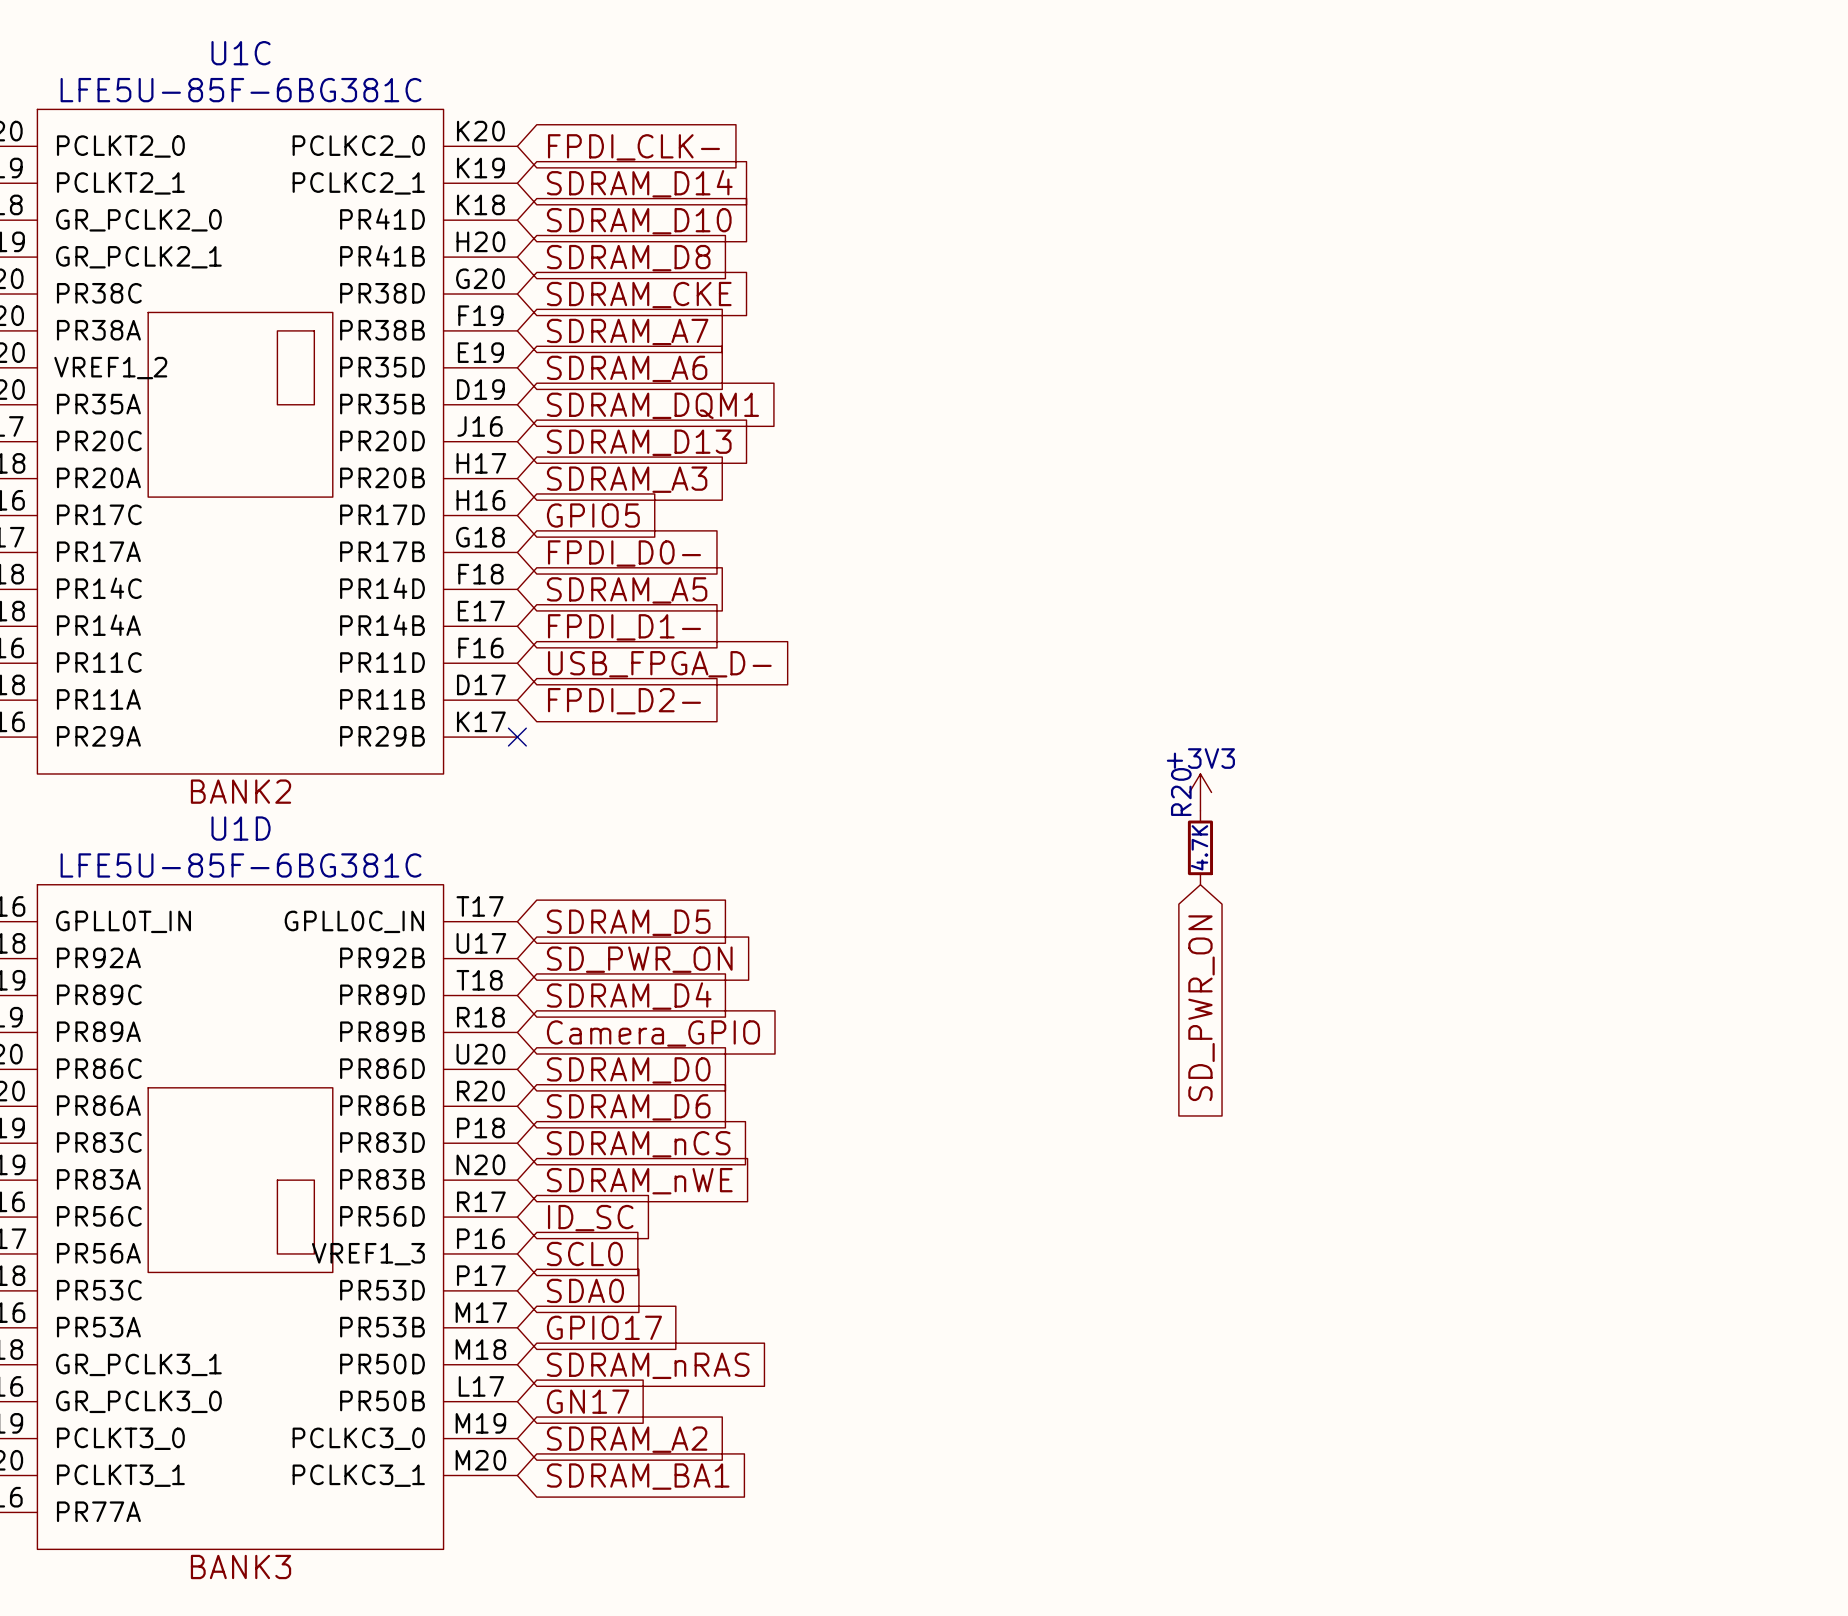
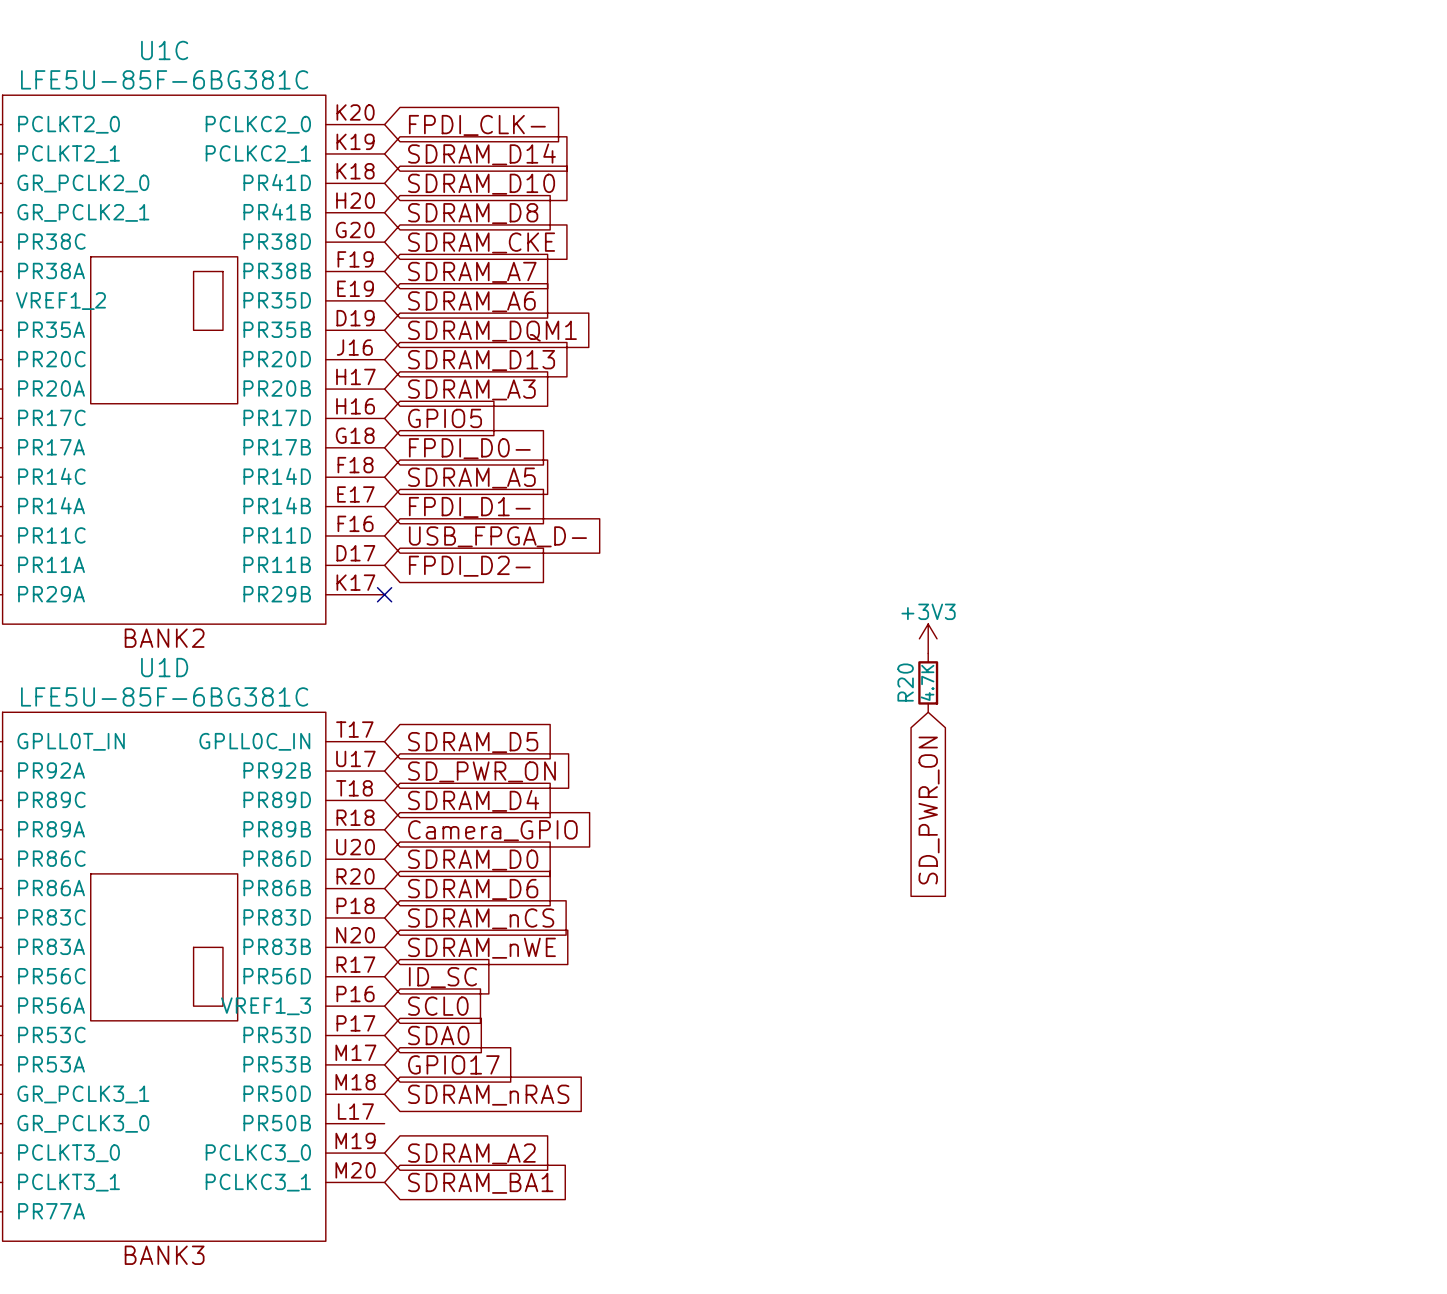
R20 name position: R20 (1181, 792) -> R20 (905, 682)
global label: GN17 (588, 1401) -> none

